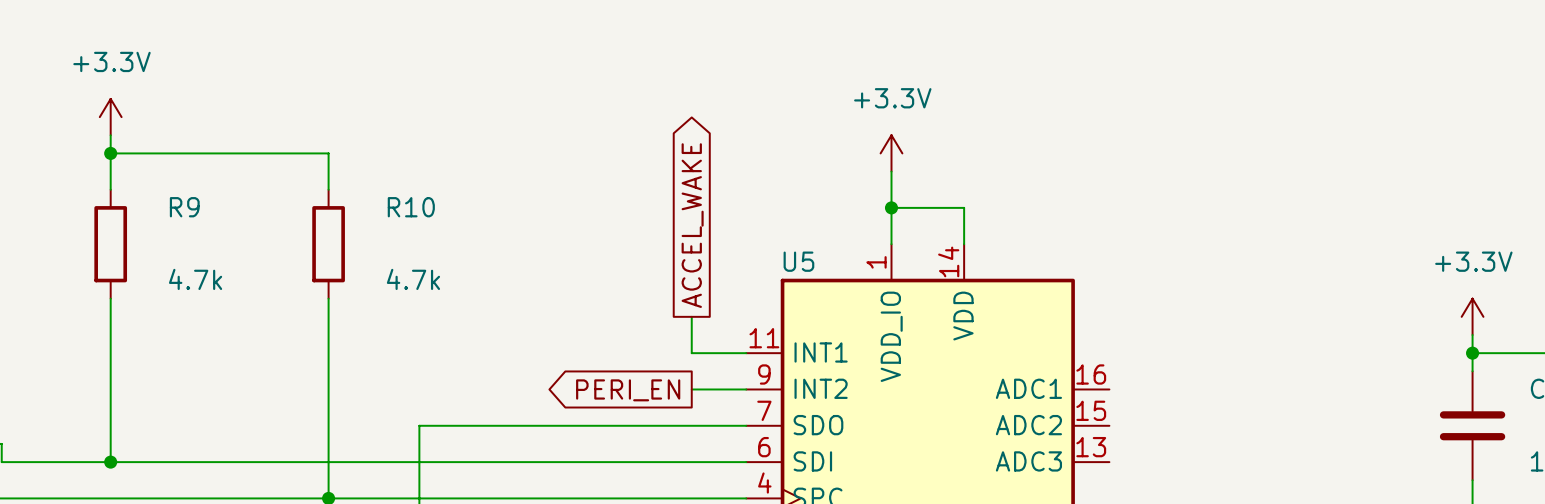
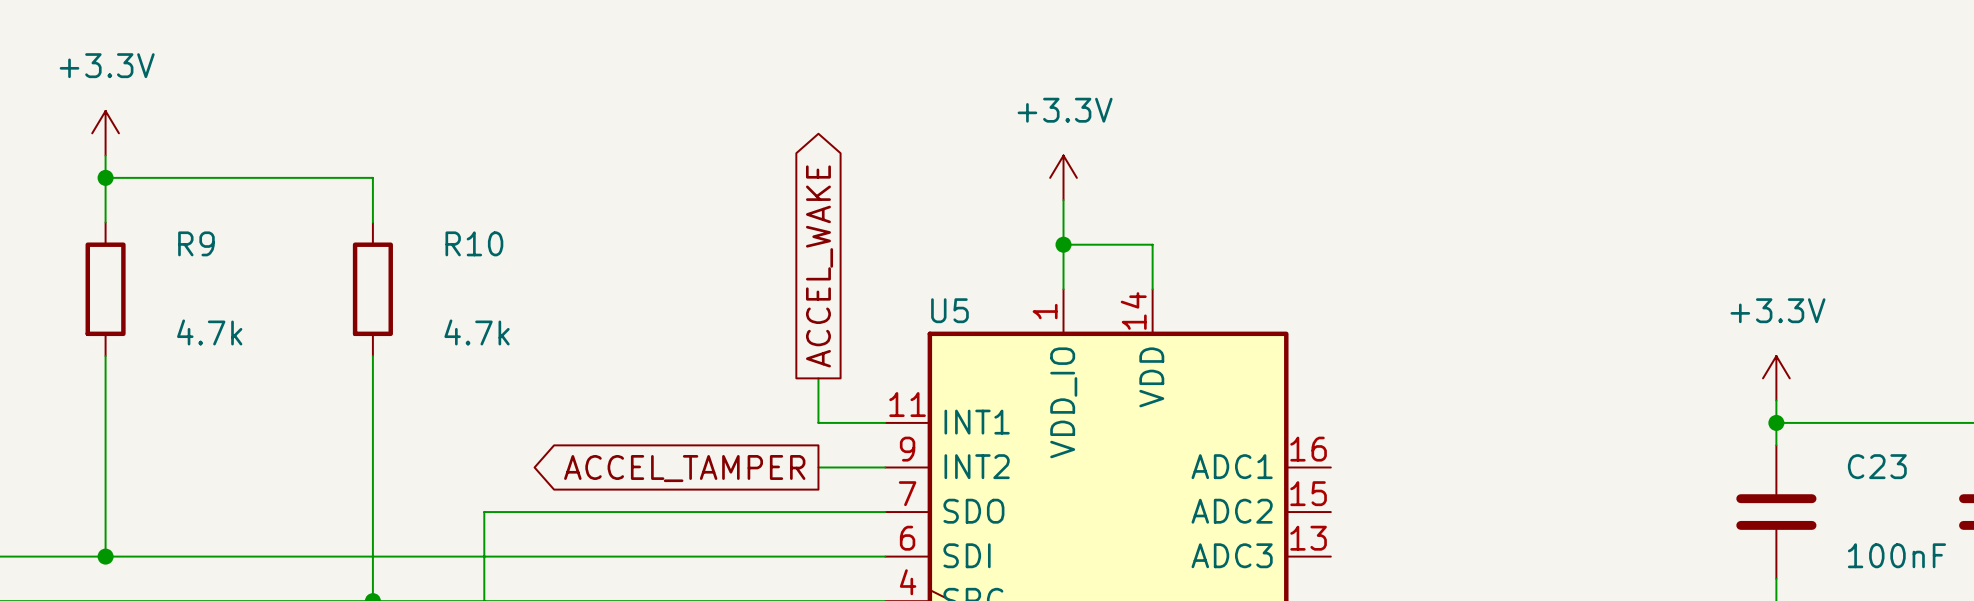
global label: PERI_EN (628, 390) -> ACCEL_TAMPER (684, 468)

